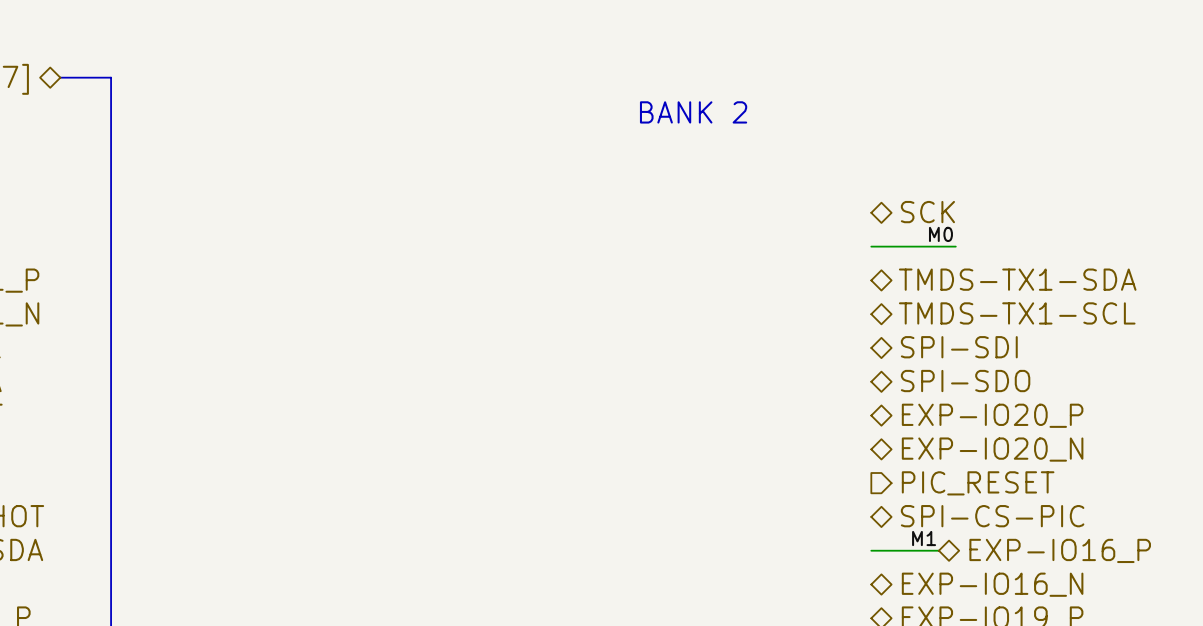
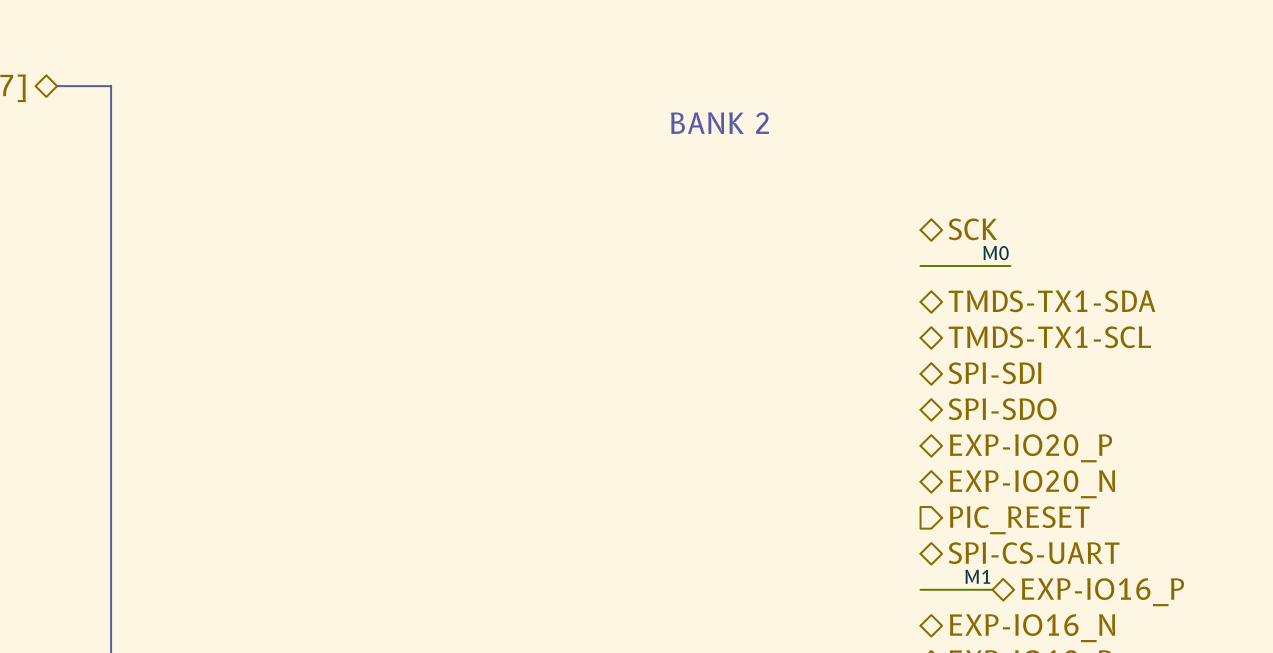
hierarchical label: SPI-CS-PIC (992, 516) -> SPI-CS-UART (1034, 553)

